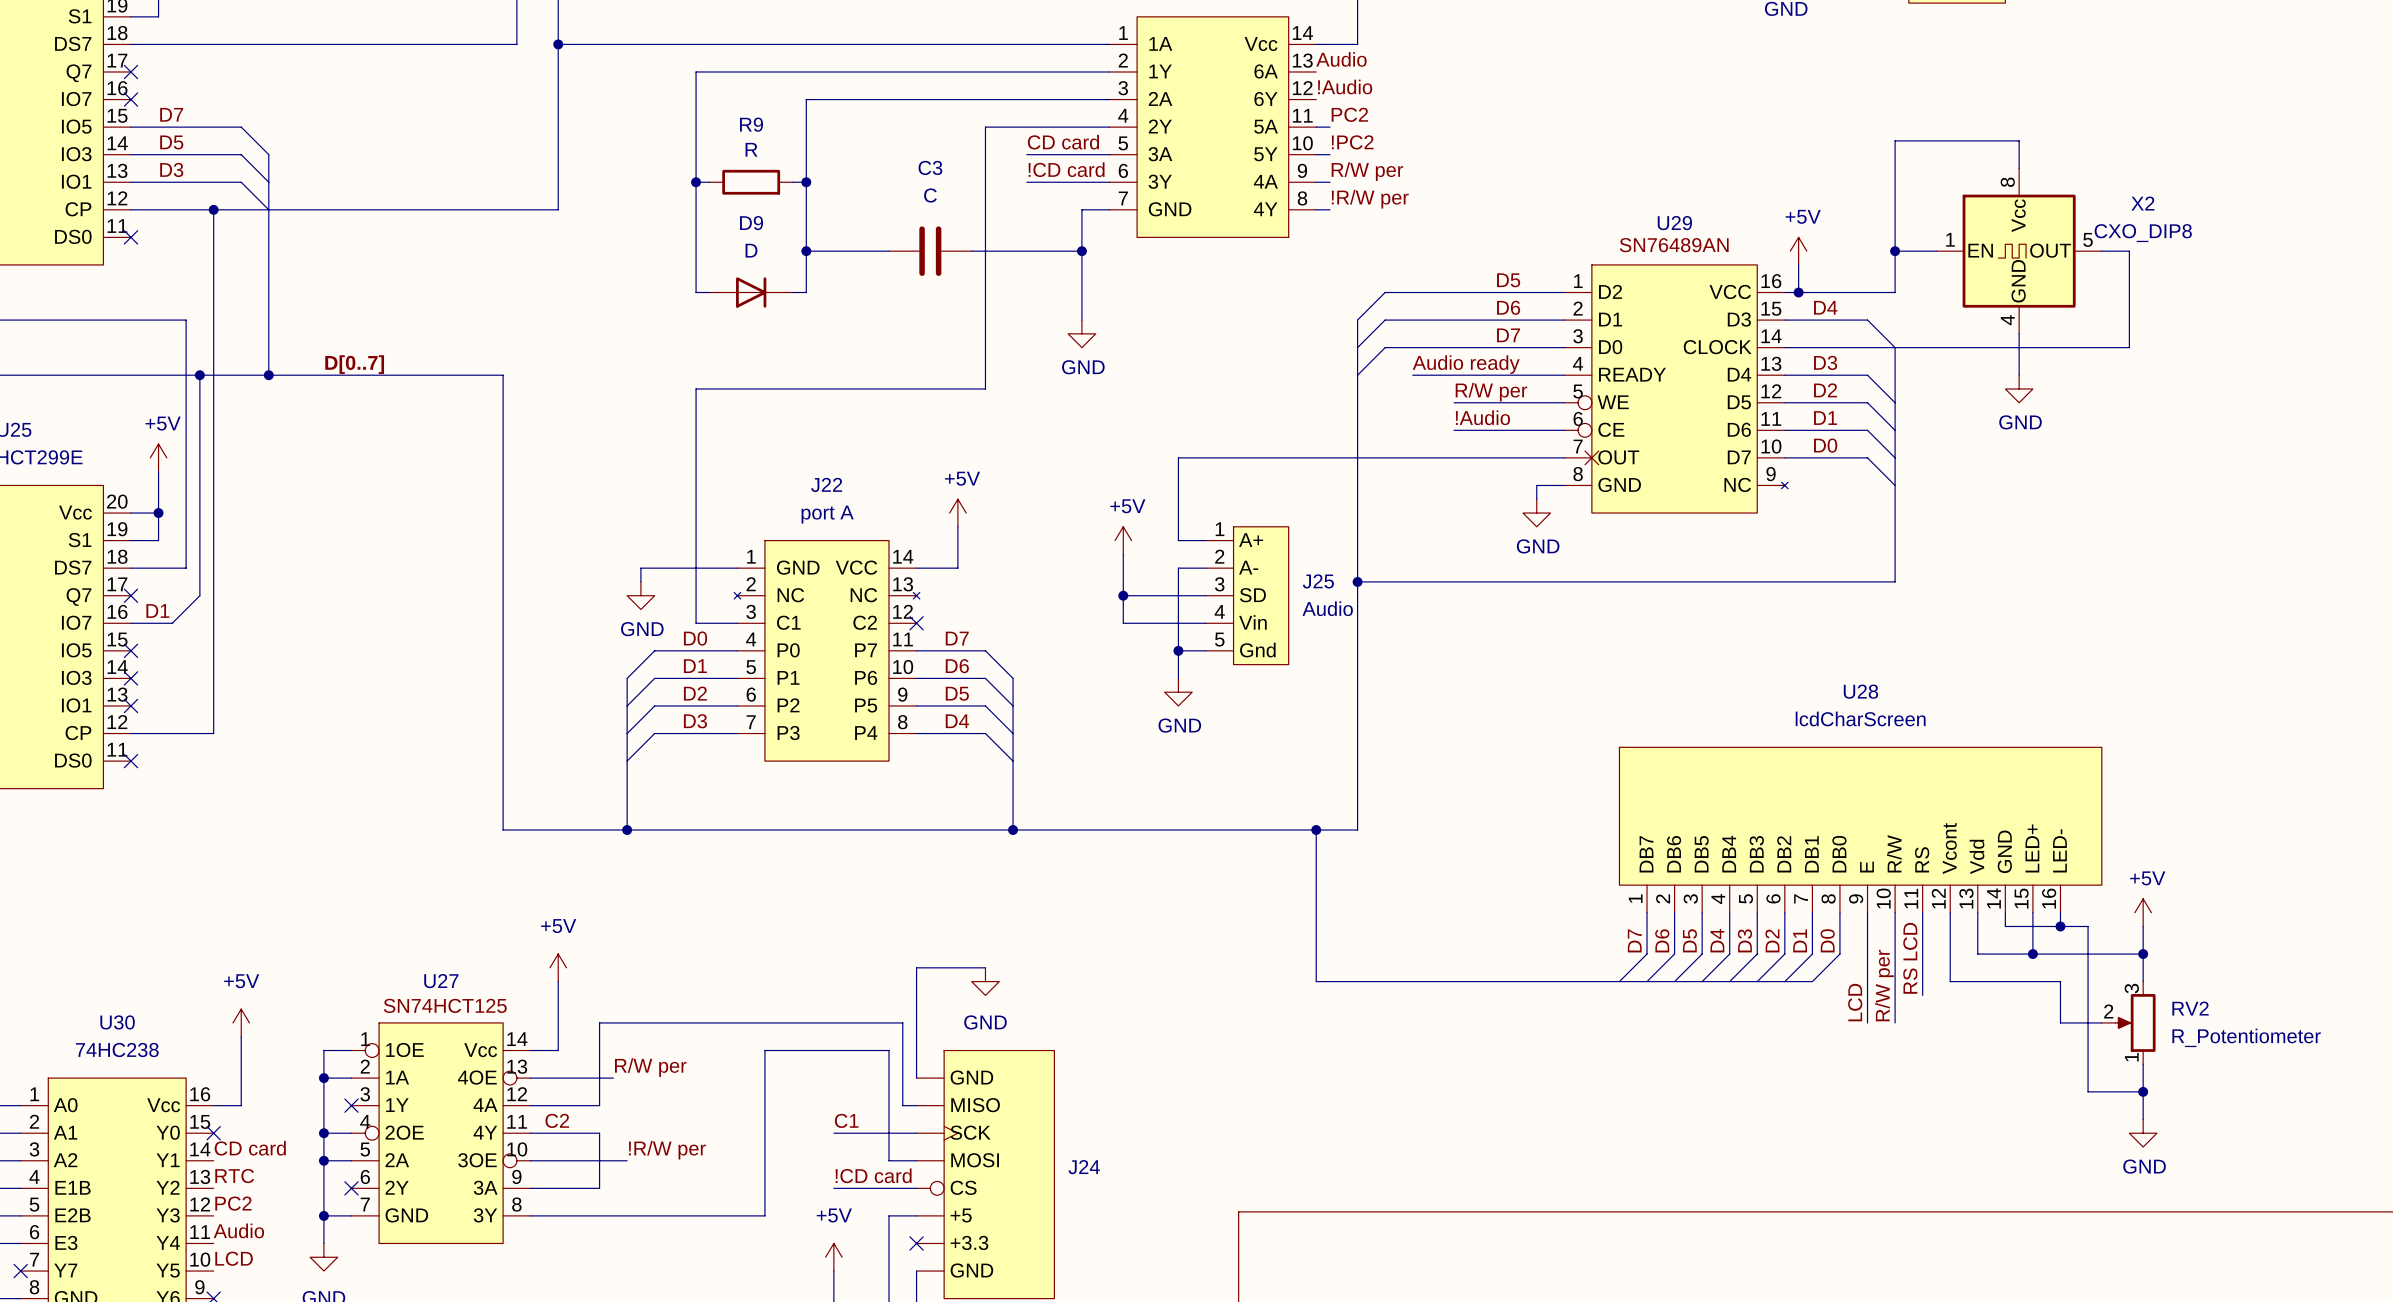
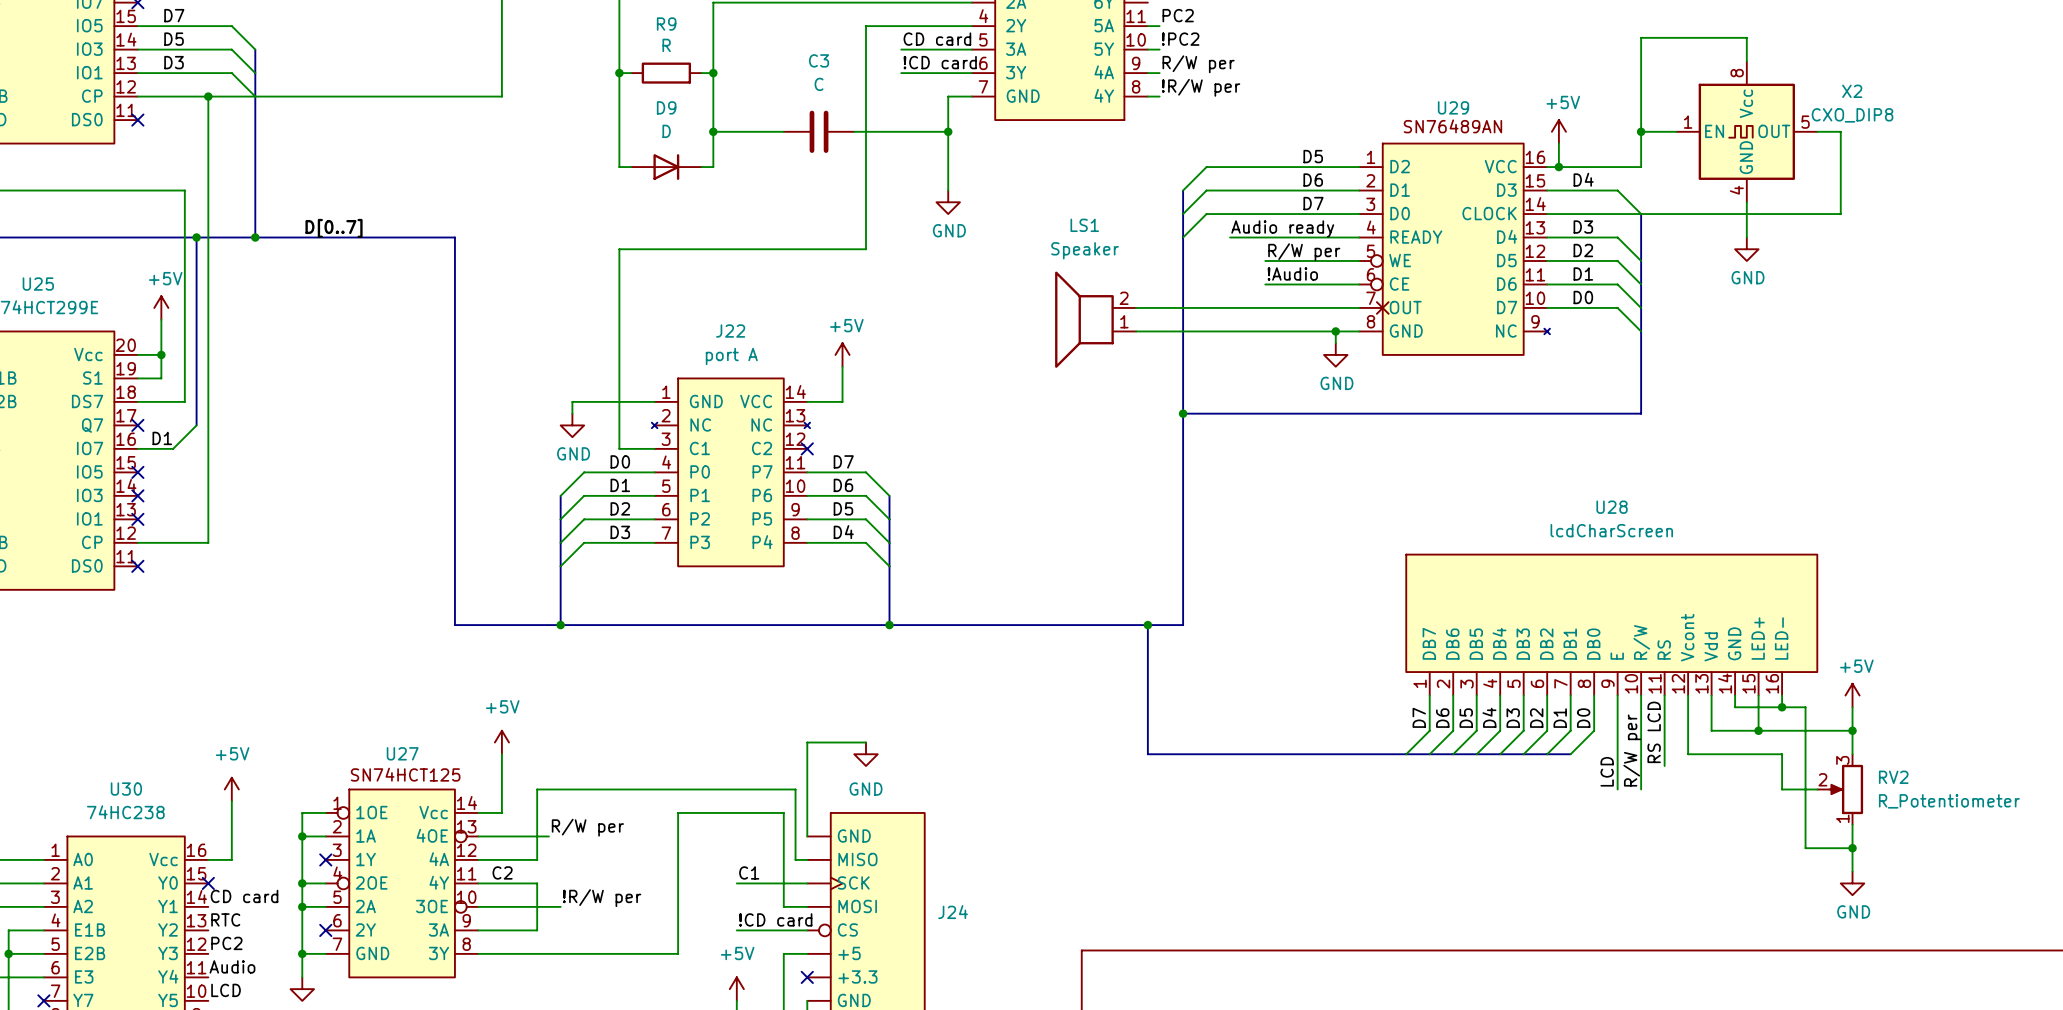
wire: (1302, 457) (1178, 457) (1178, 540) (1205, 540) -> none
LS1: none -> Speaker (1095, 319)
wire: none -> (1136, 331) (1335, 331)
junction: none -> (1335, 331)
power symbol: +5V (1123, 540) -> none
wire: (1123, 554) (1123, 623) (1205, 623) -> none
wire: (1205, 568) (1178, 568) (1178, 678) -> none
wire: (1123, 595) (1205, 595) -> none
junction: (1123, 595) -> none
J25: Audio (1247, 595) -> none
wire: (1178, 650) (1205, 650) -> none
junction: (1178, 650) -> none
power symbol: GND (1178, 692) -> none

